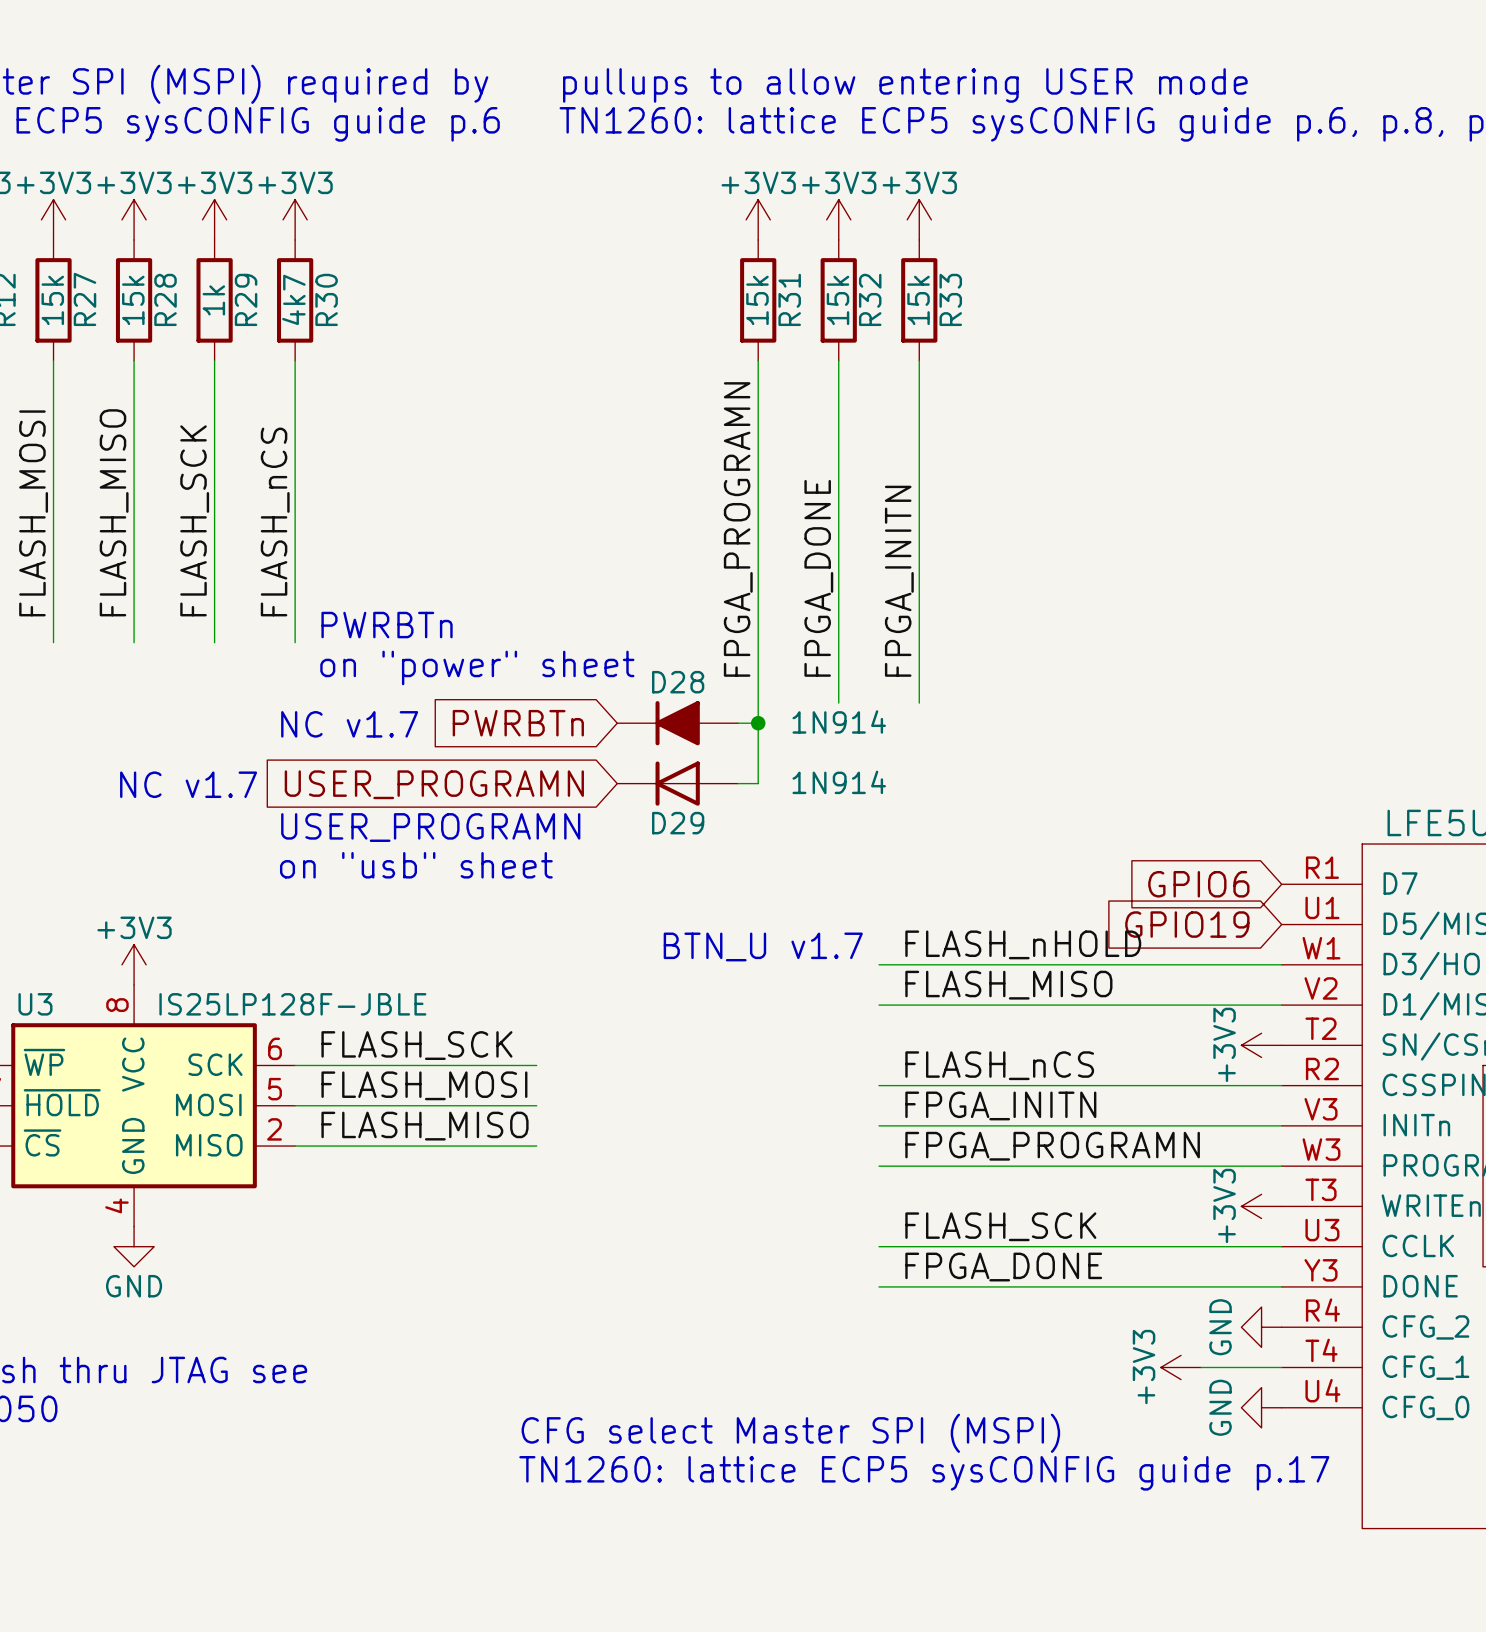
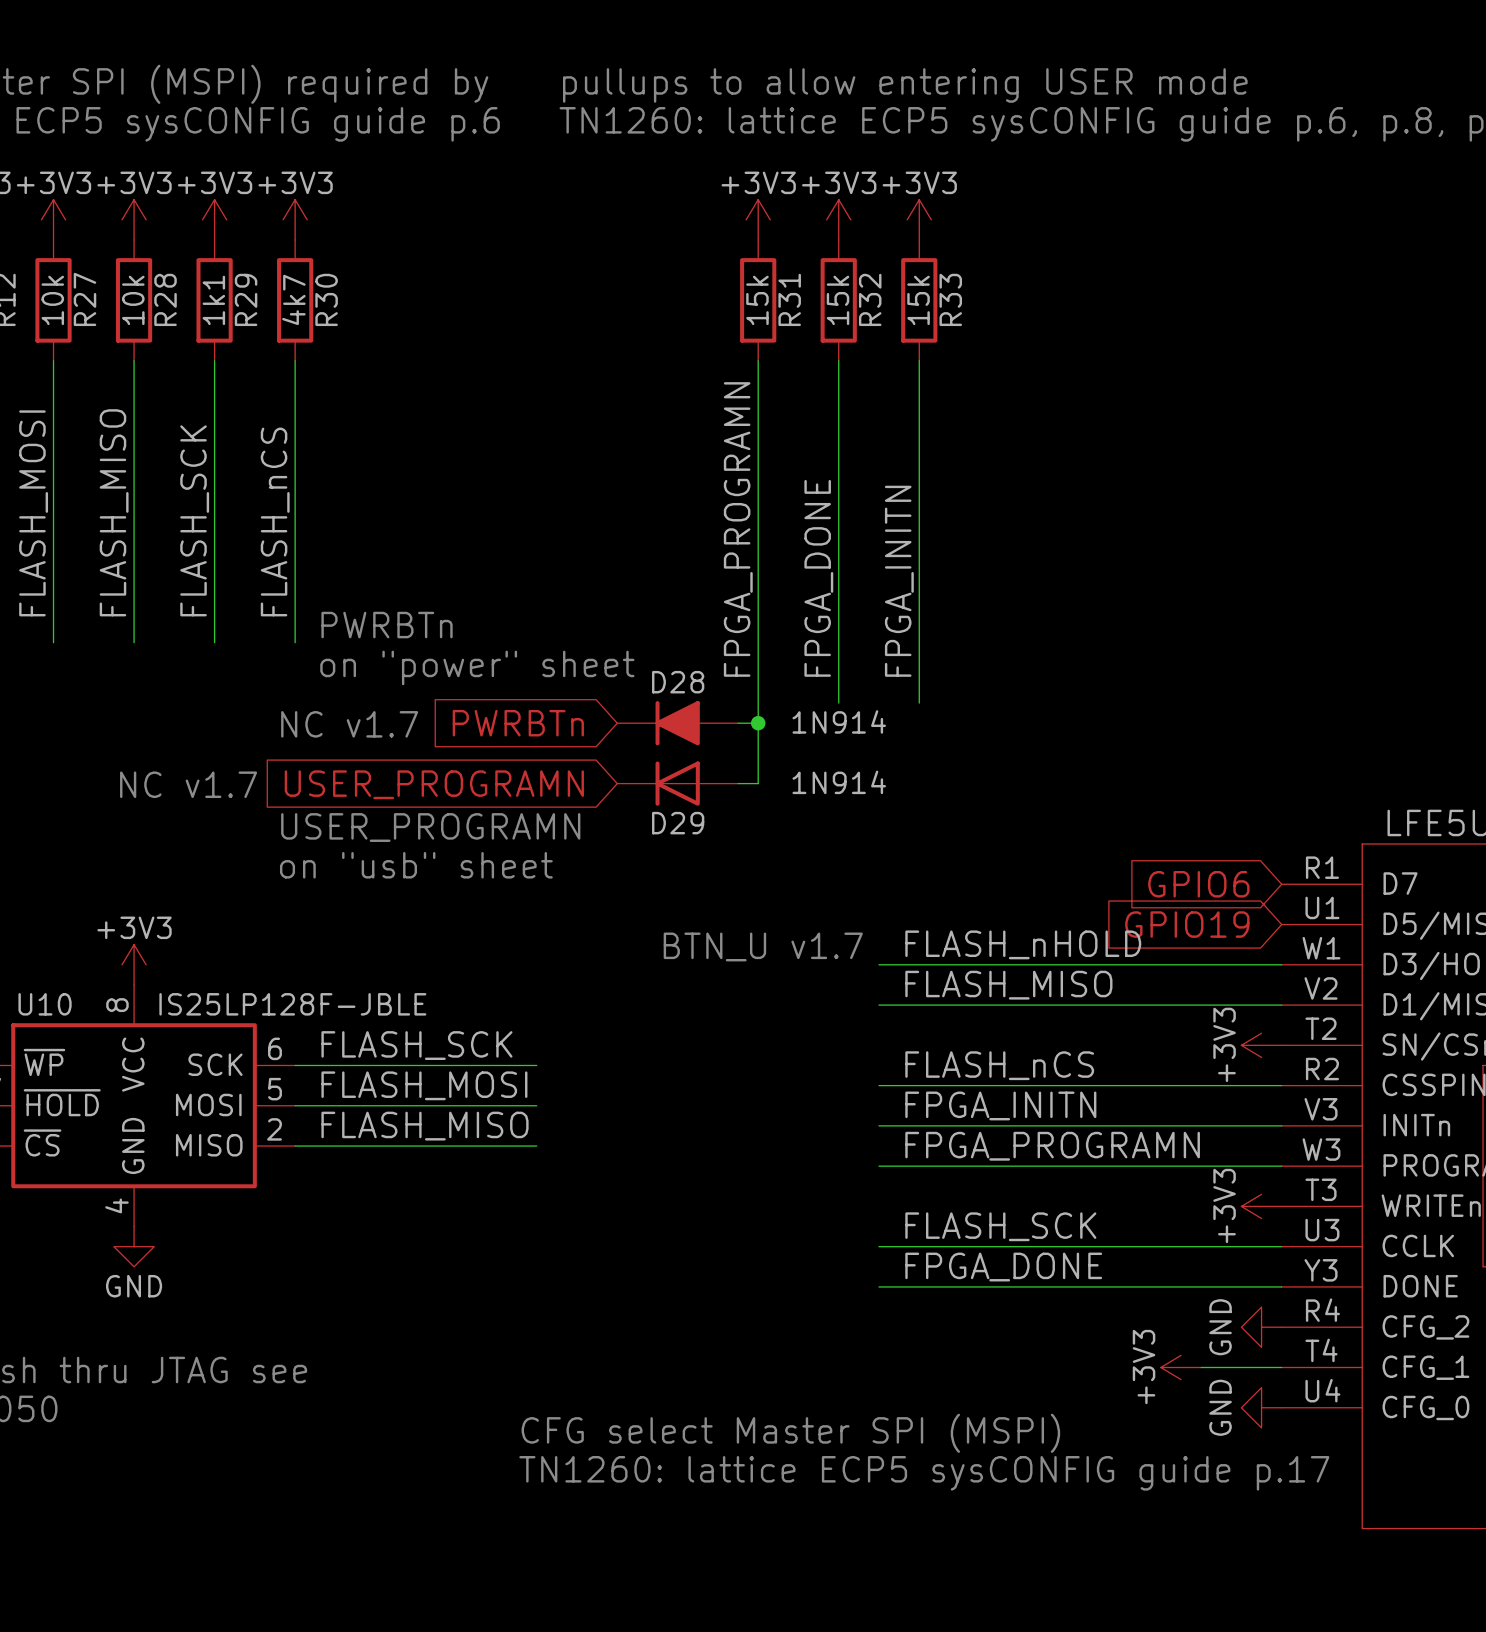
R27 value: 15k (52, 300) -> 10k (52, 300)
R28 value: 15k (133, 300) -> 10k (133, 300)
R29 value: 1k (213, 300) -> 1k1 (213, 300)
U3 name: U3 (35, 1004) -> U10 (45, 1004)

